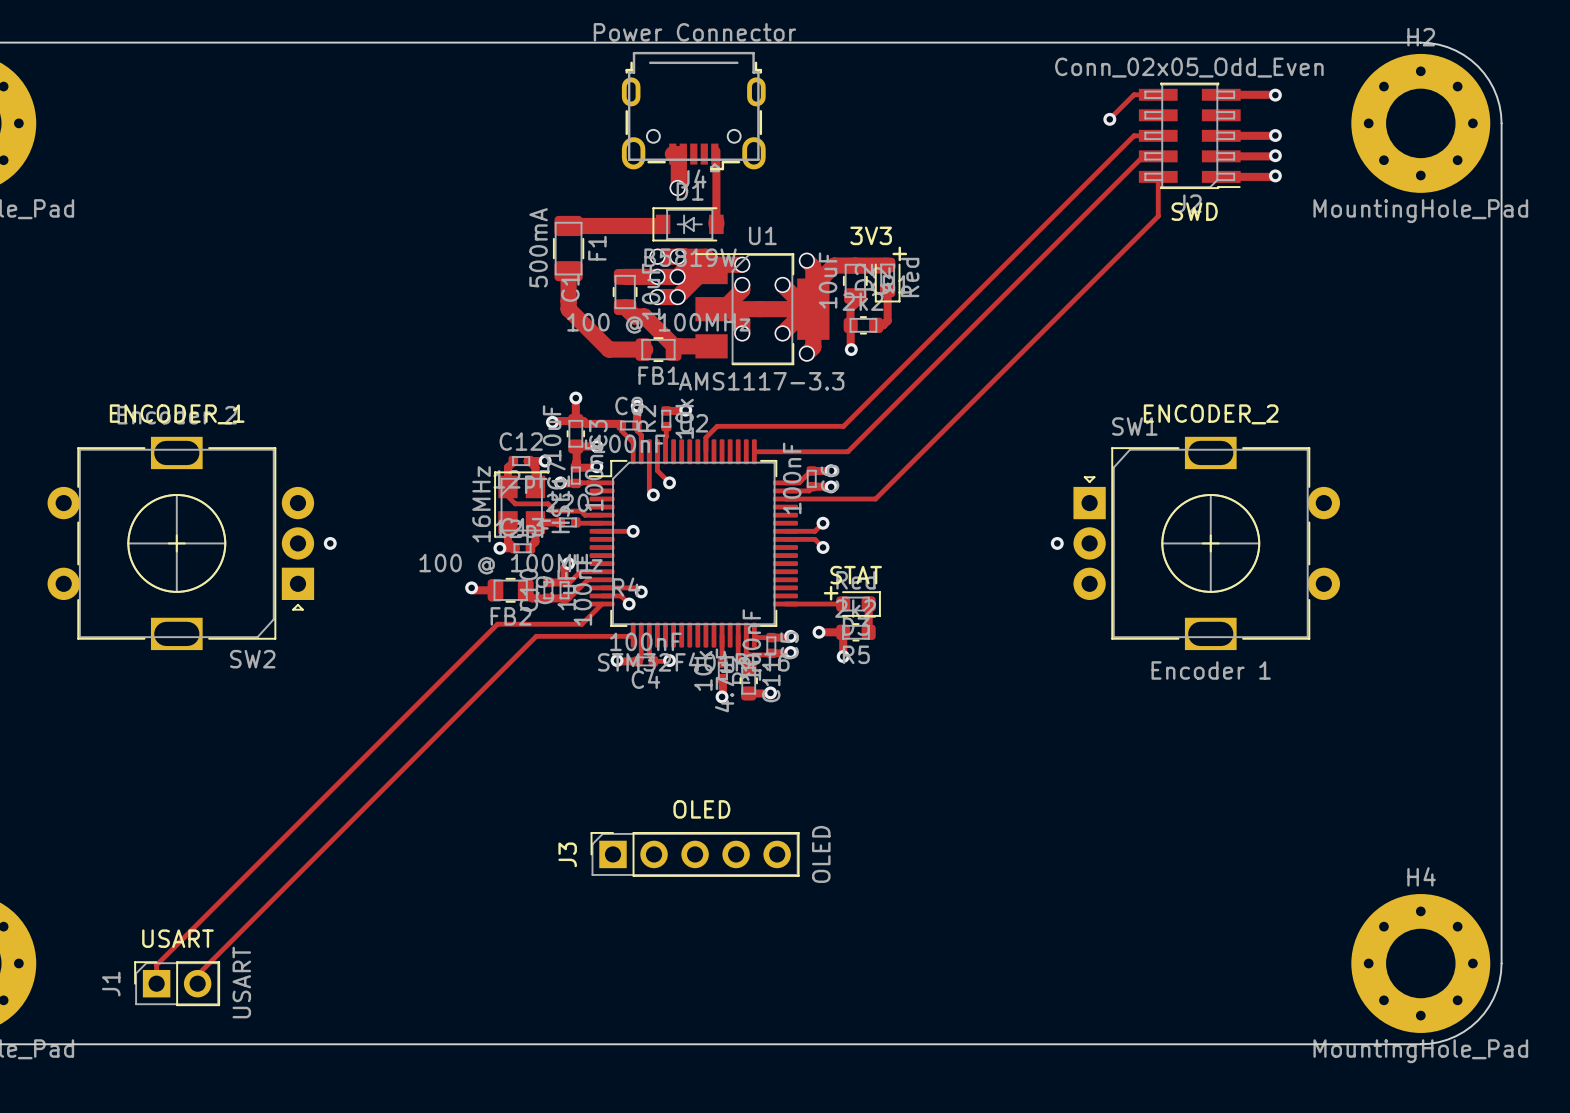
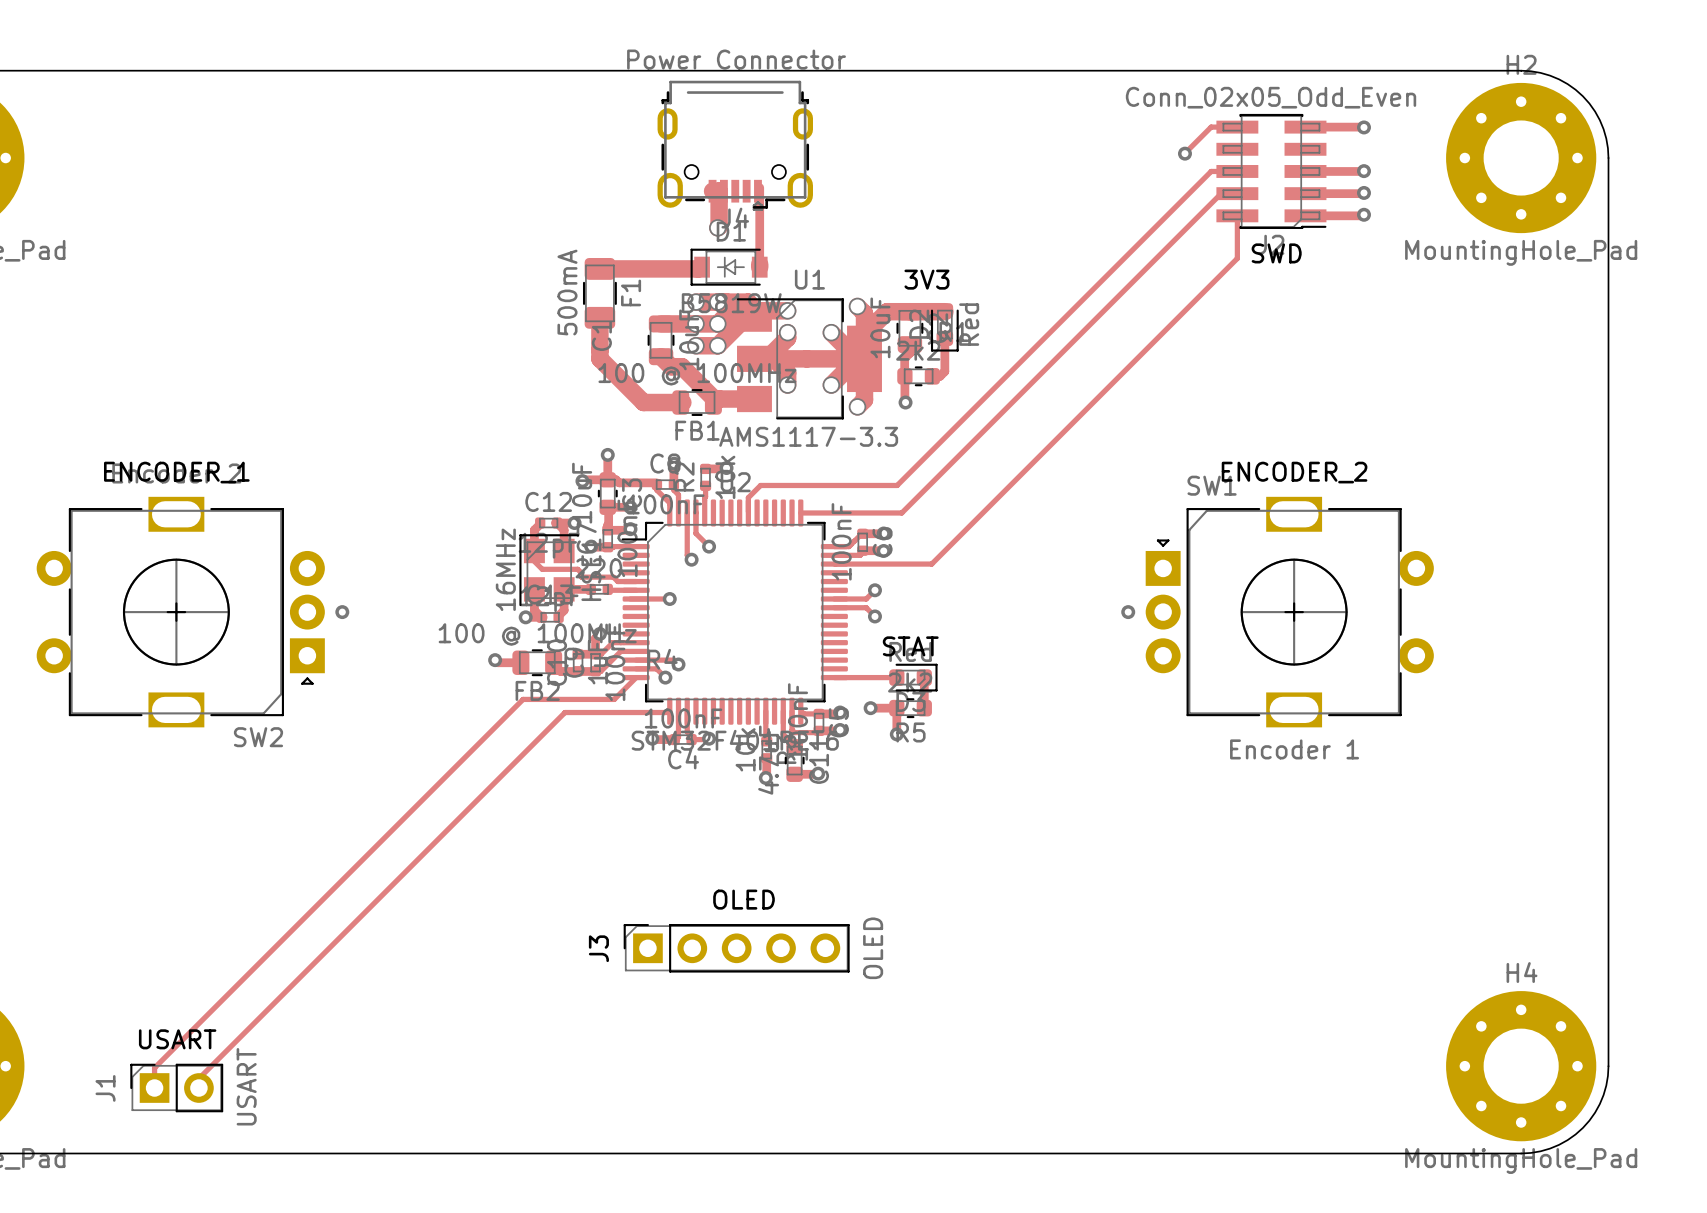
text: + (899, 253) -> none
text: + (831, 593) -> none

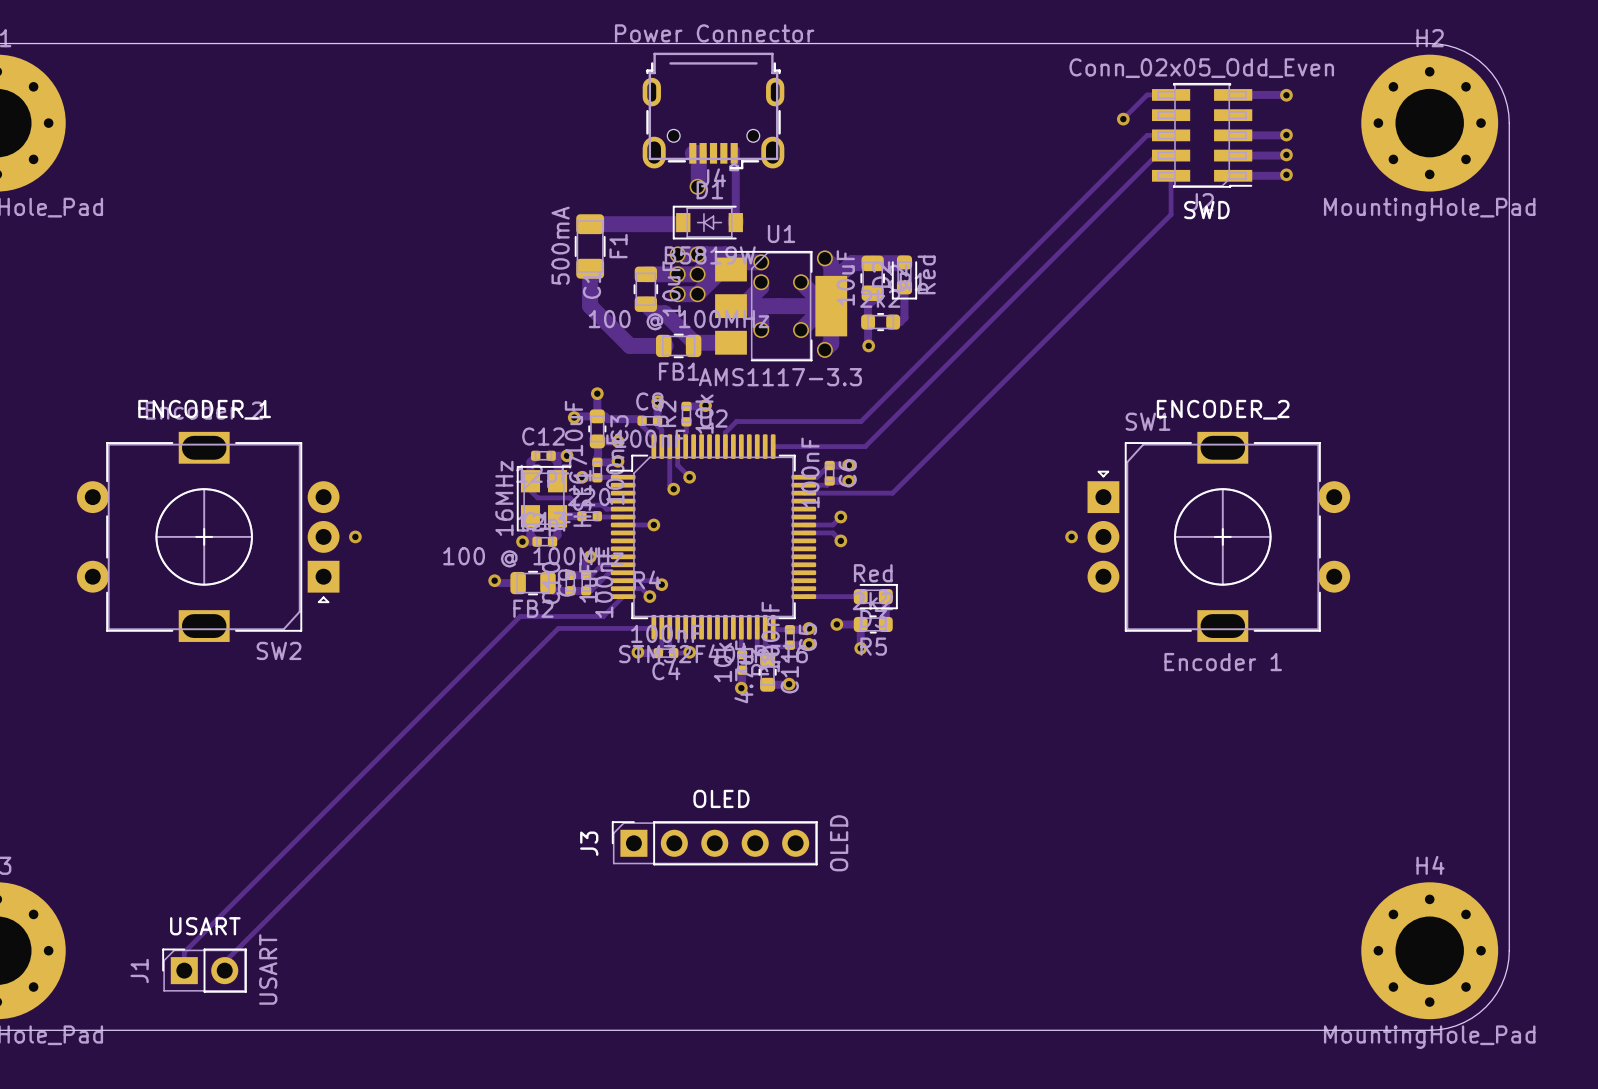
text: 3V3 (926, 279) -> none
text: STAT (910, 646) -> none

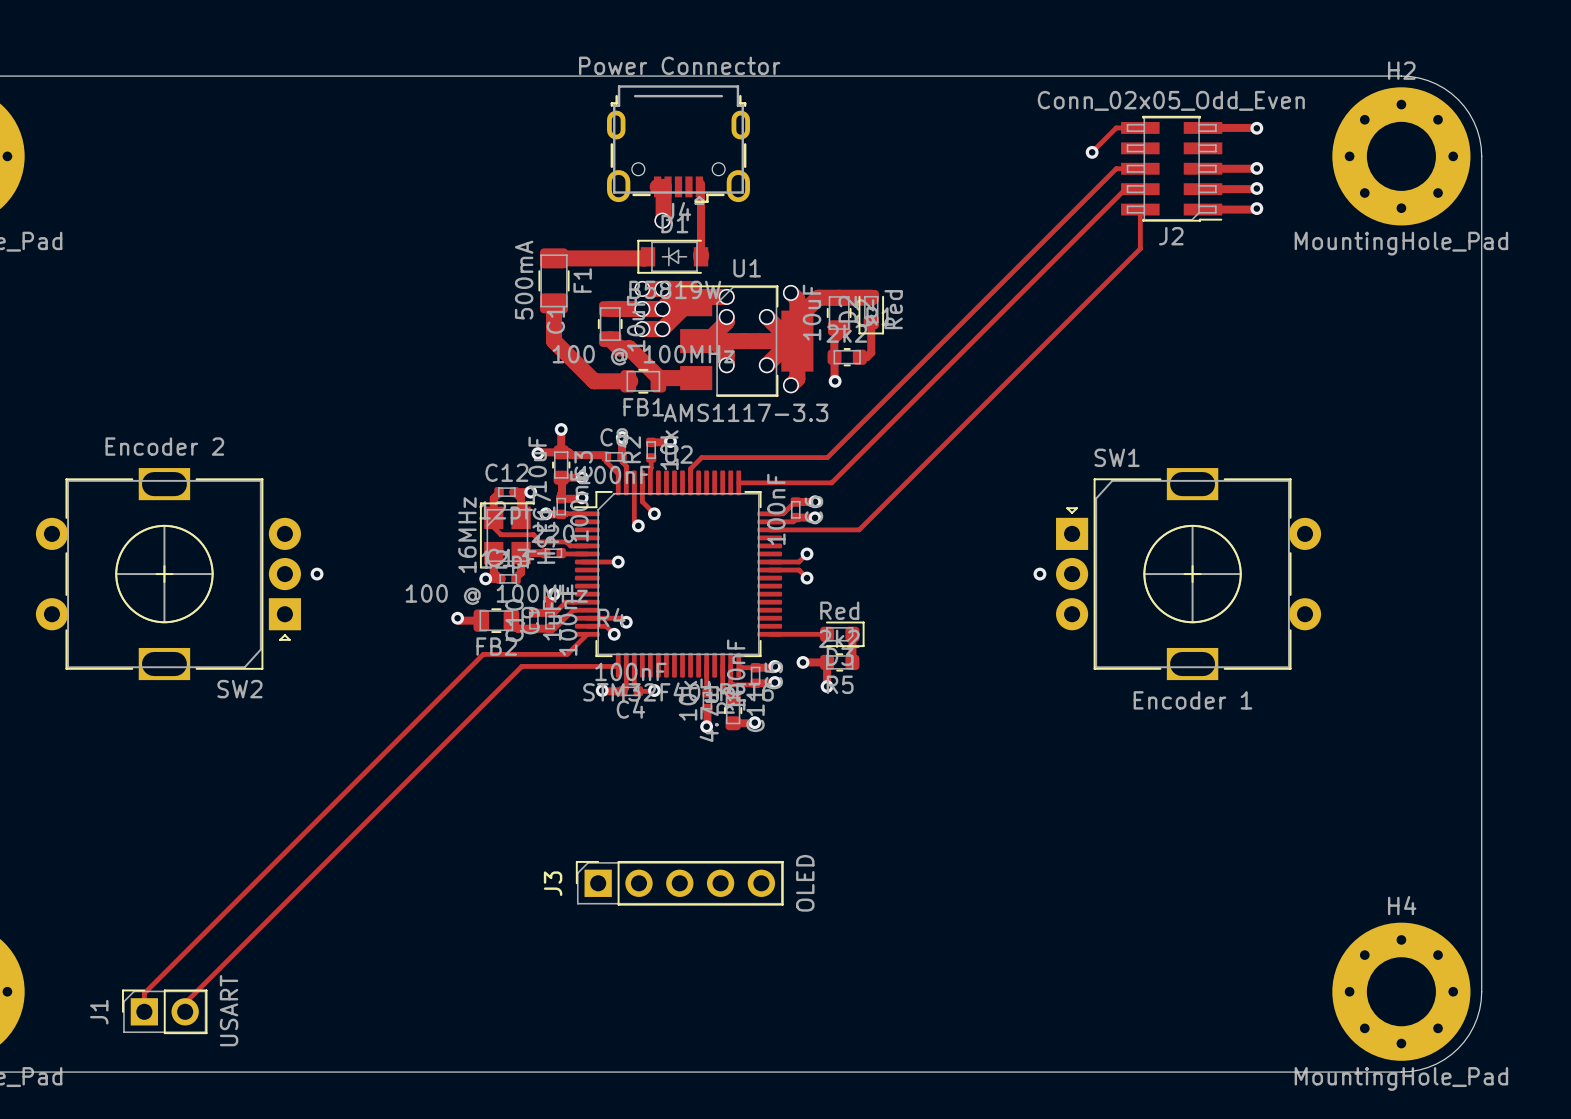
text: SWD (1206, 210) -> none
text: ENCODER_1 (204, 409) -> none
text: ENCODER_2 (1223, 409) -> none
text: OLED (721, 798) -> none
text: USART (205, 926) -> none

